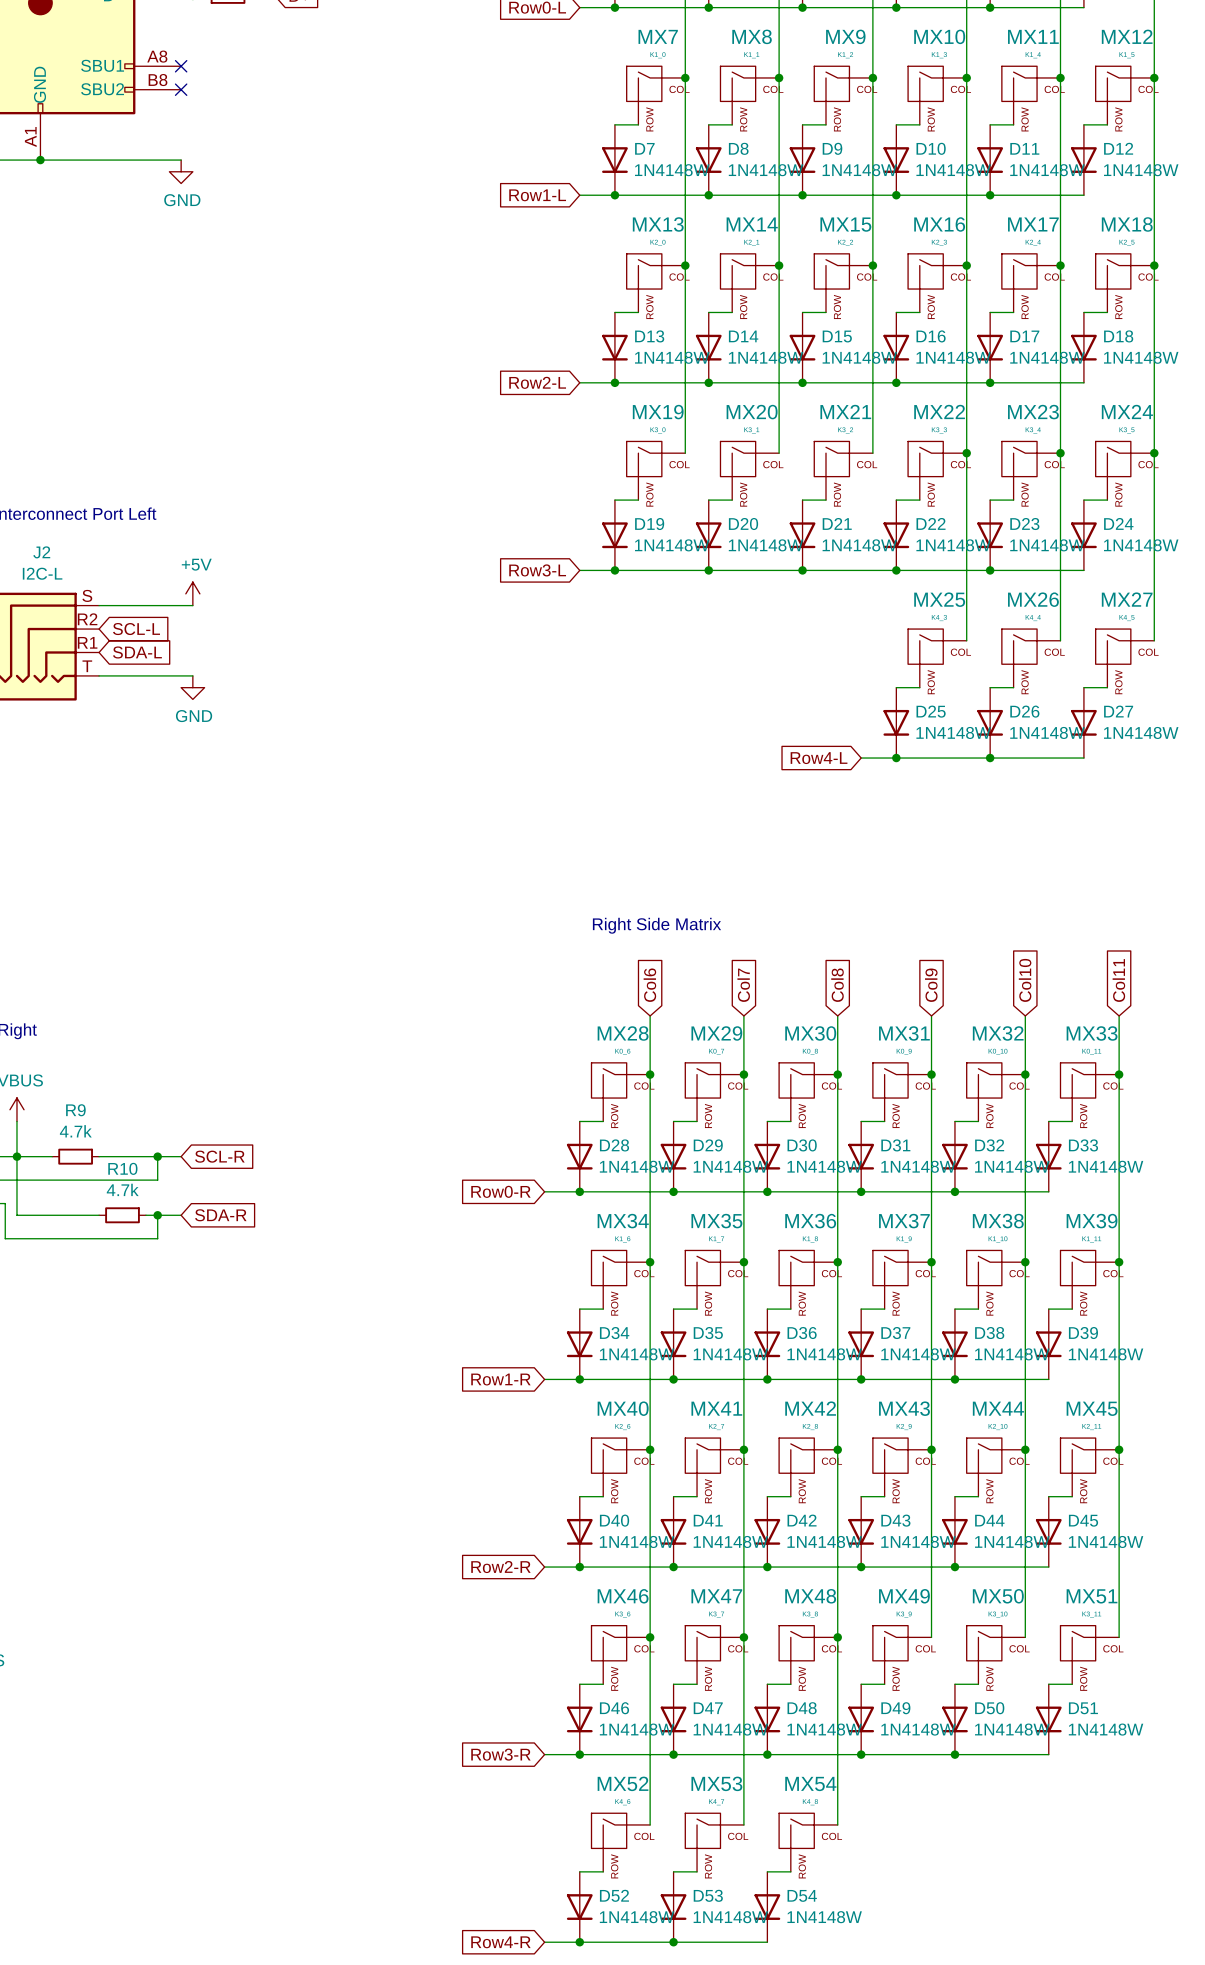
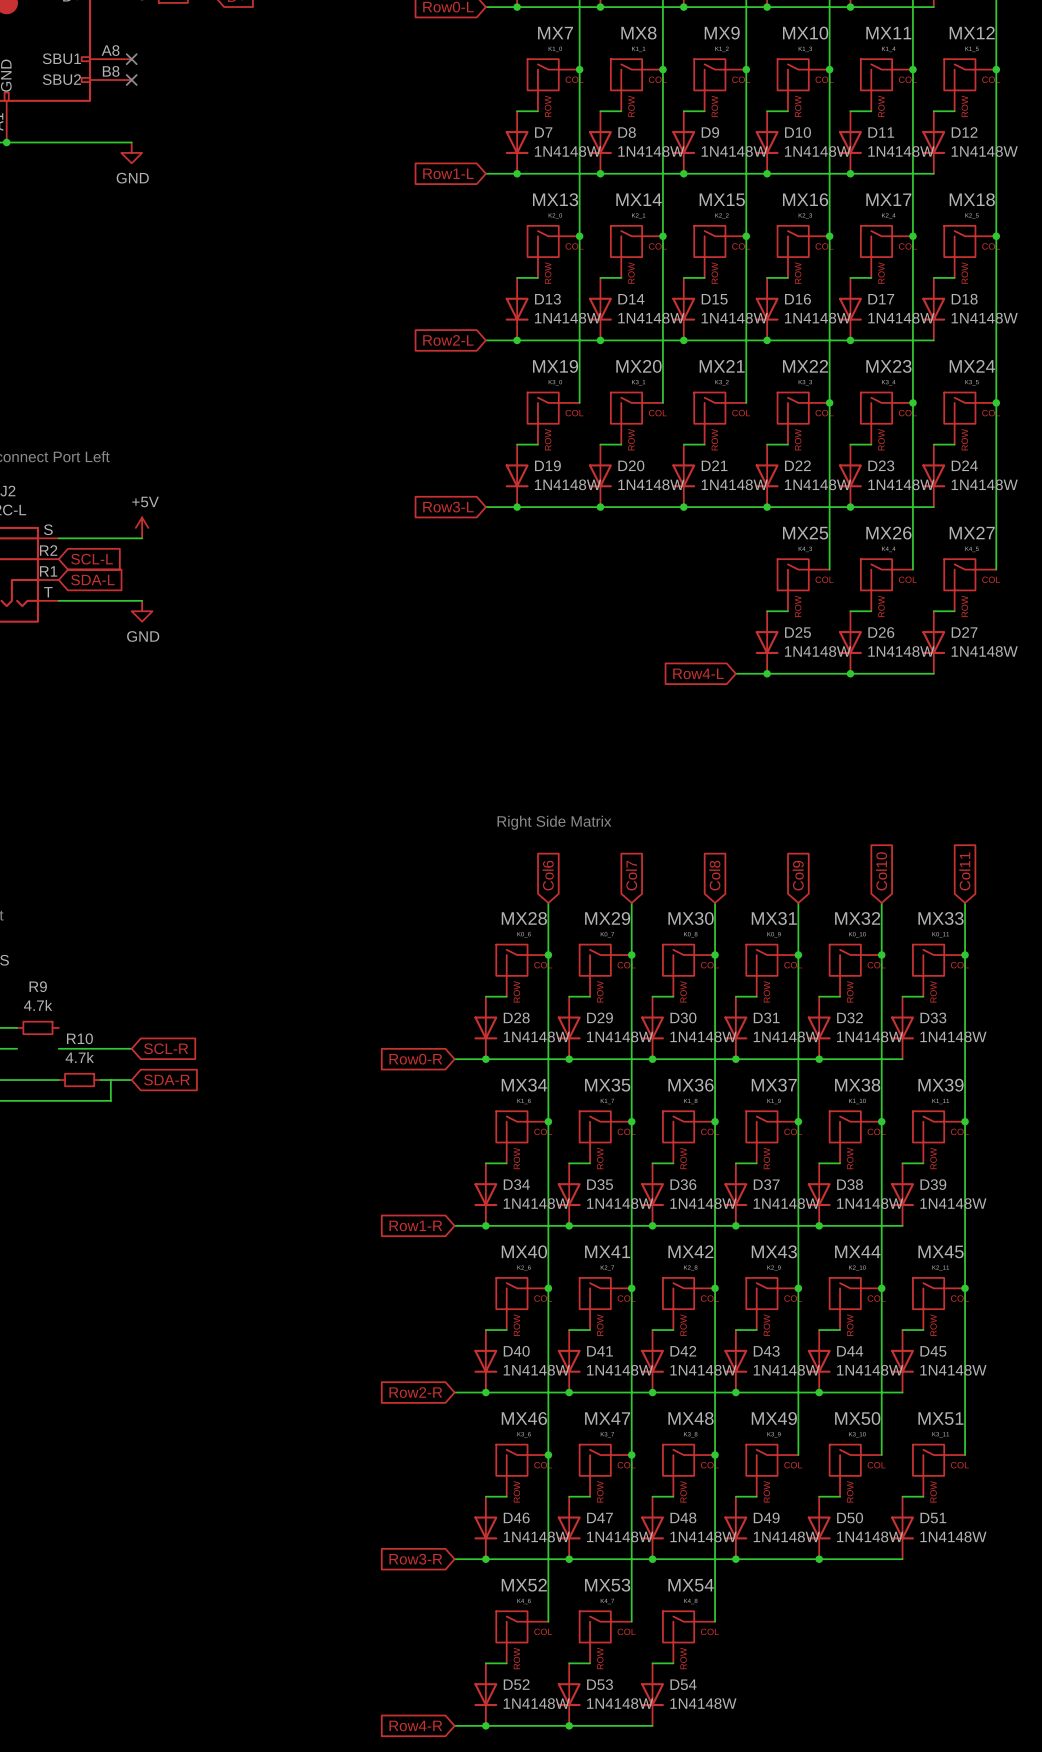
wire: (99, 1156) (181, 1156) -> none
wire: (157, 1156) (157, 1180) -> (131, 1048) (110, 1048)
junction: (157, 1156) -> none
global label position: SCL-R (219, 1156) -> SCL-R (166, 1048)
wire: (52, 1180) (99, 1180) -> none
junction: (157, 1215) -> none

